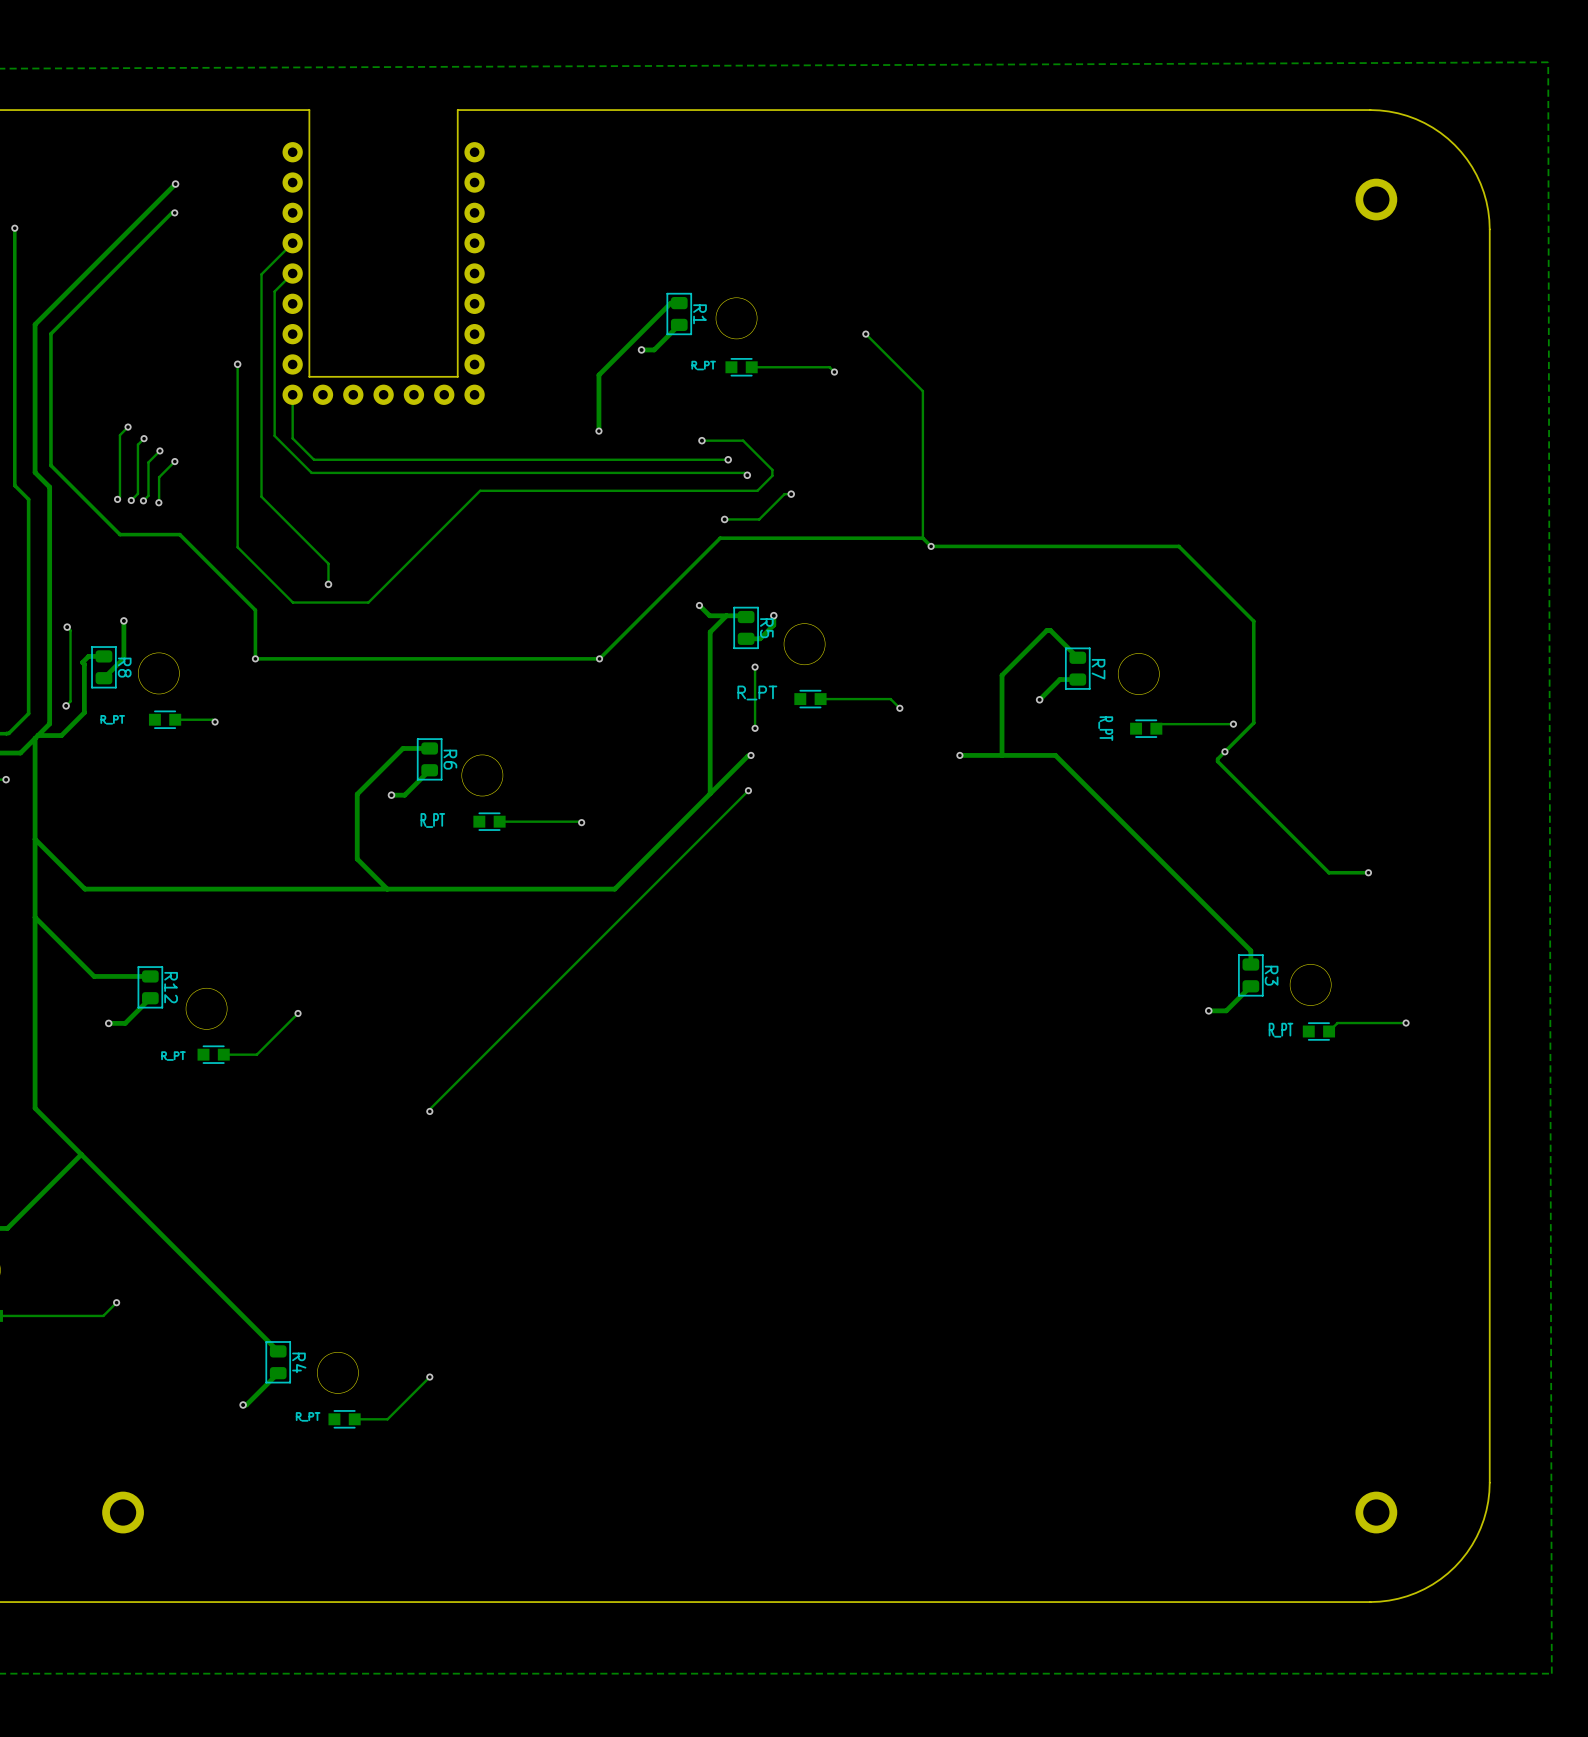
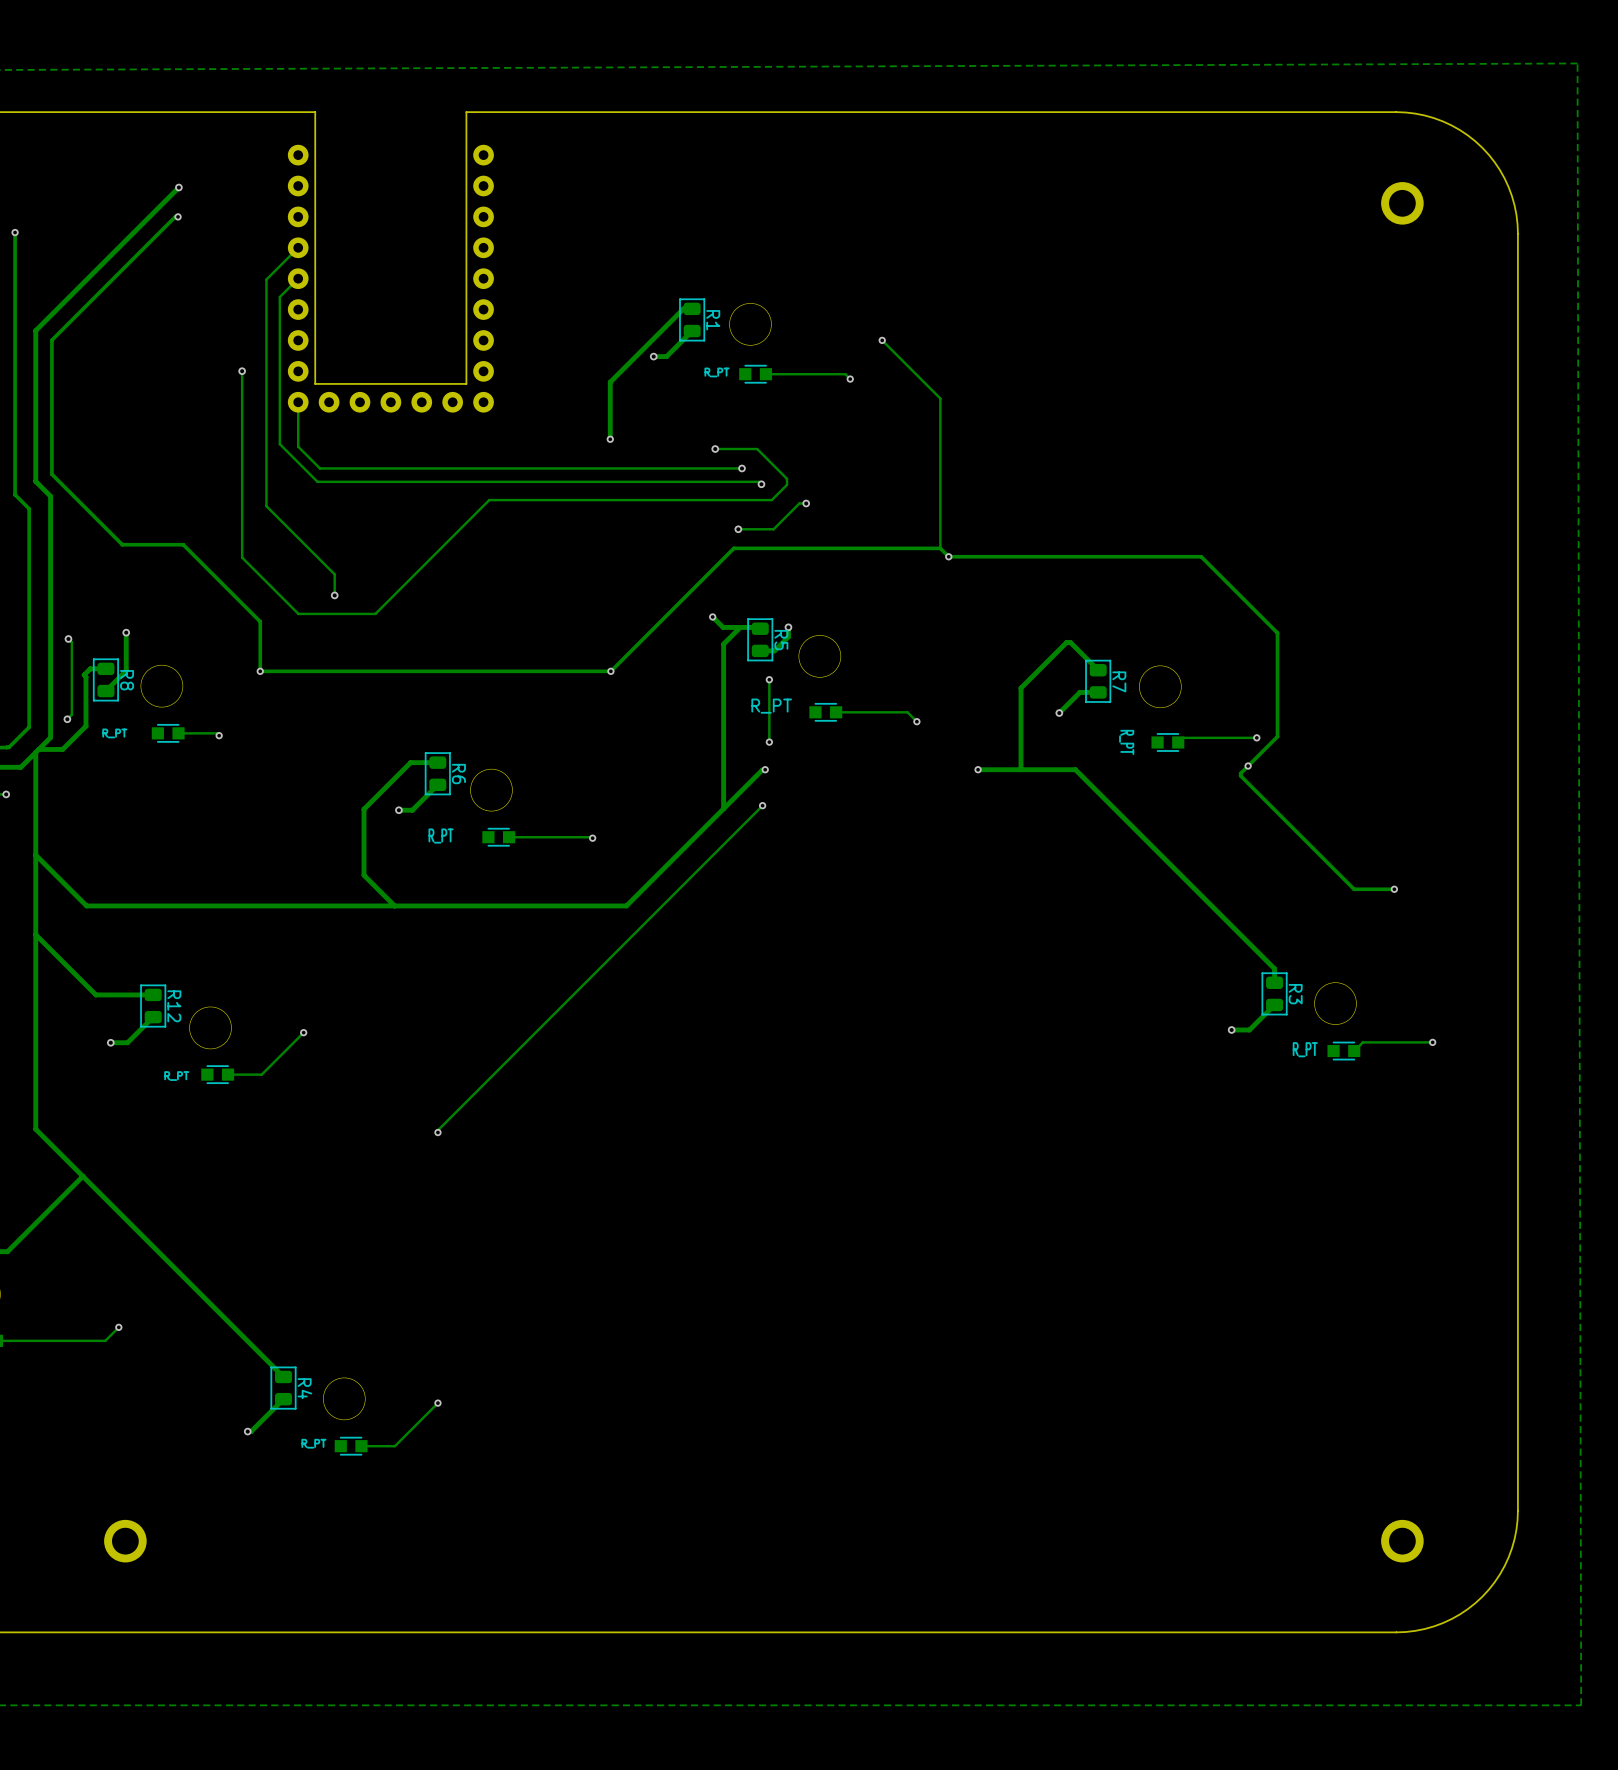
track: (128, 427) (119, 435) (119, 497) (117, 499) -> none
via: (128, 427) -> none
track: (144, 438) (137, 444) (137, 493) (131, 500) -> none
via: (144, 438) -> none
track: (159, 450) (148, 462) (148, 495) (143, 500) -> none
via: (159, 450) -> none
track: (174, 461) (159, 477) (158, 502) -> none
via: (174, 461) -> none
via: (117, 499) -> none
via: (131, 500) -> none
via: (143, 500) -> none
via: (158, 502) -> none

